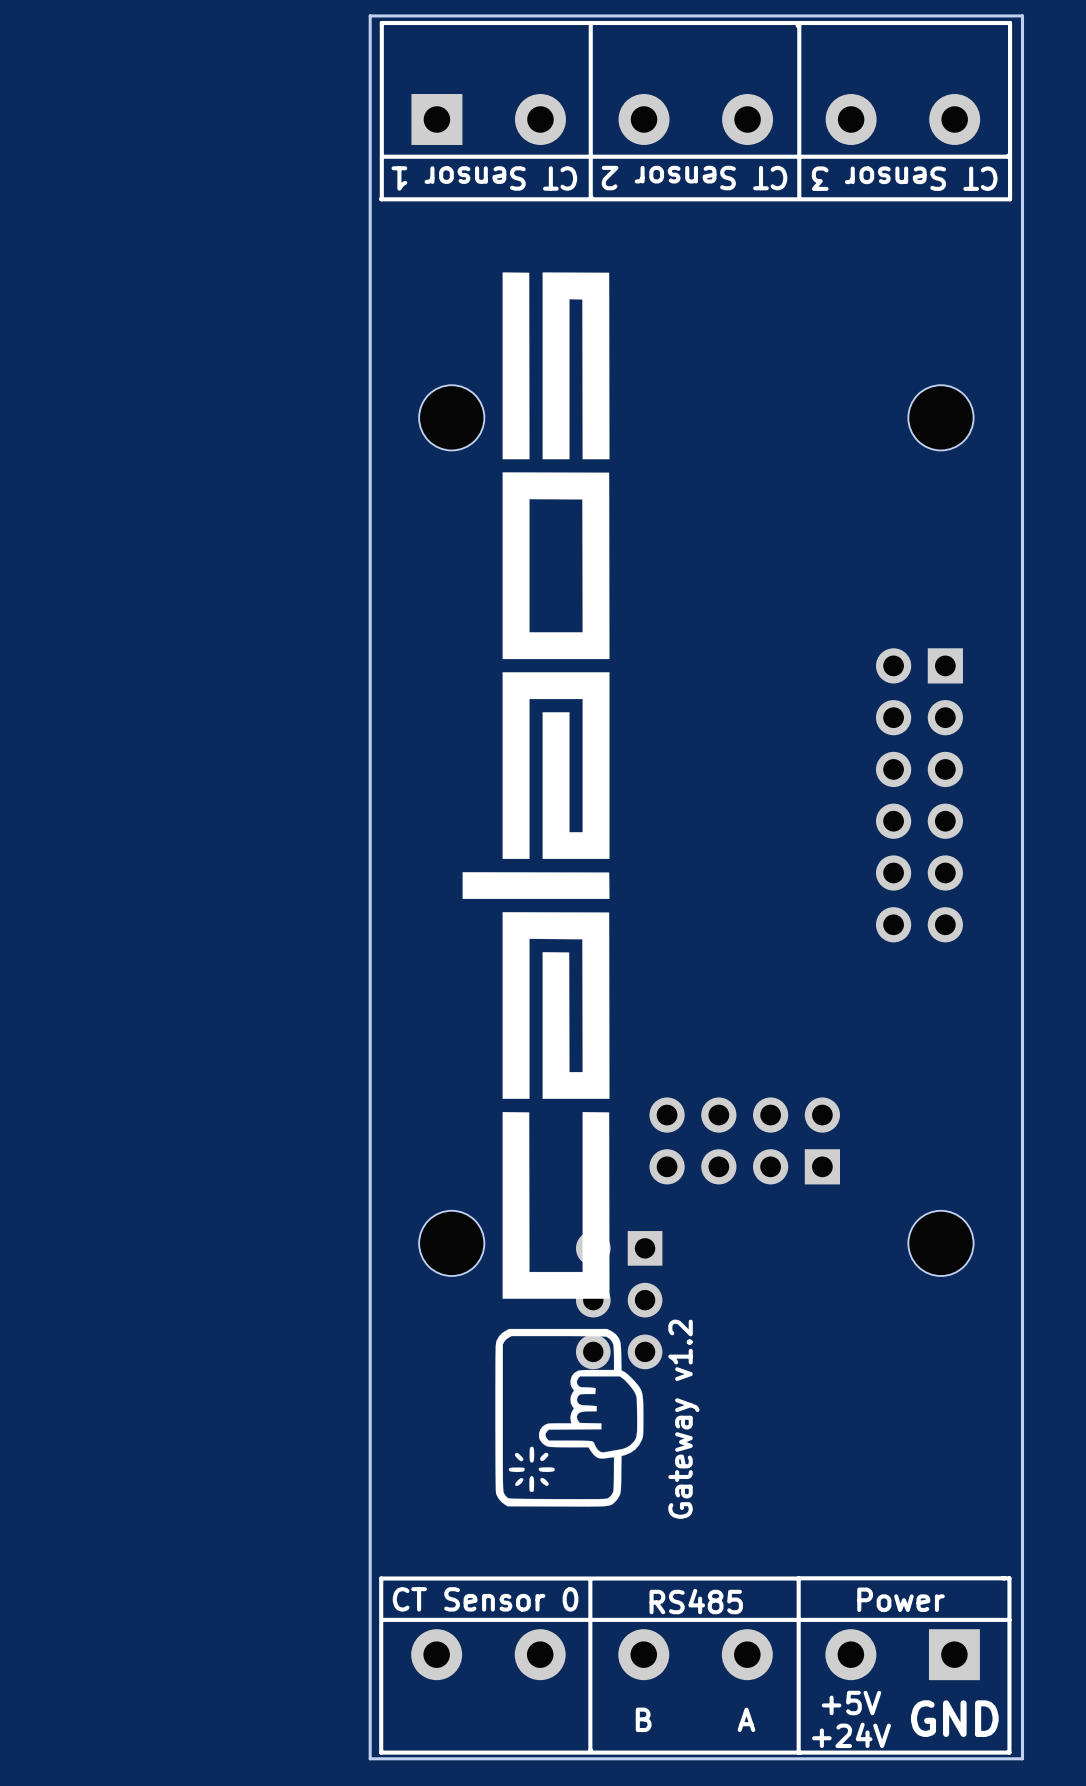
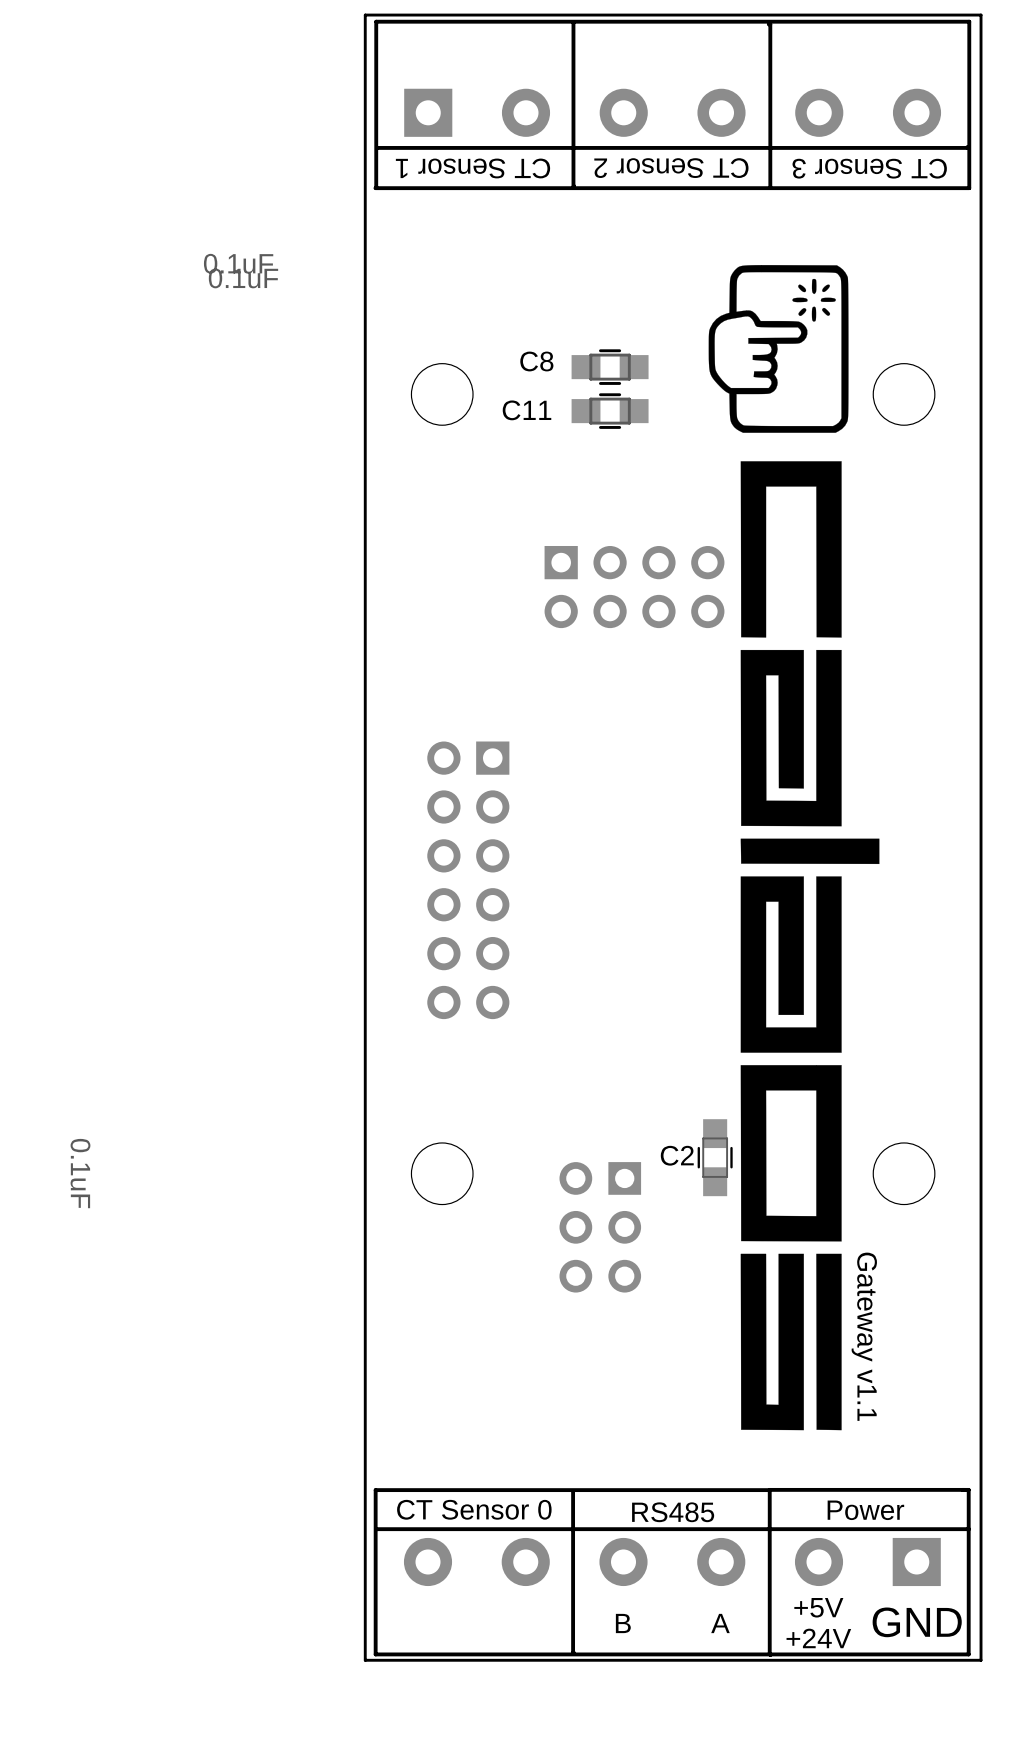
drawing: [462, 272, 644, 1507] -> none
drawing: none -> [708, 265, 880, 1431]
C8: none -> 0.1uF (610, 367)
C11: none -> 0.1uF (610, 411)
part: none -> (634, 587)
part position: (919, 795) -> (468, 880)
part: (744, 1140) -> none
C2: none -> 0.1uF (715, 1157)
text: none -> Gateway v1.1 (864, 1336)
text: Gateway v1.2 (683, 1419) -> none

